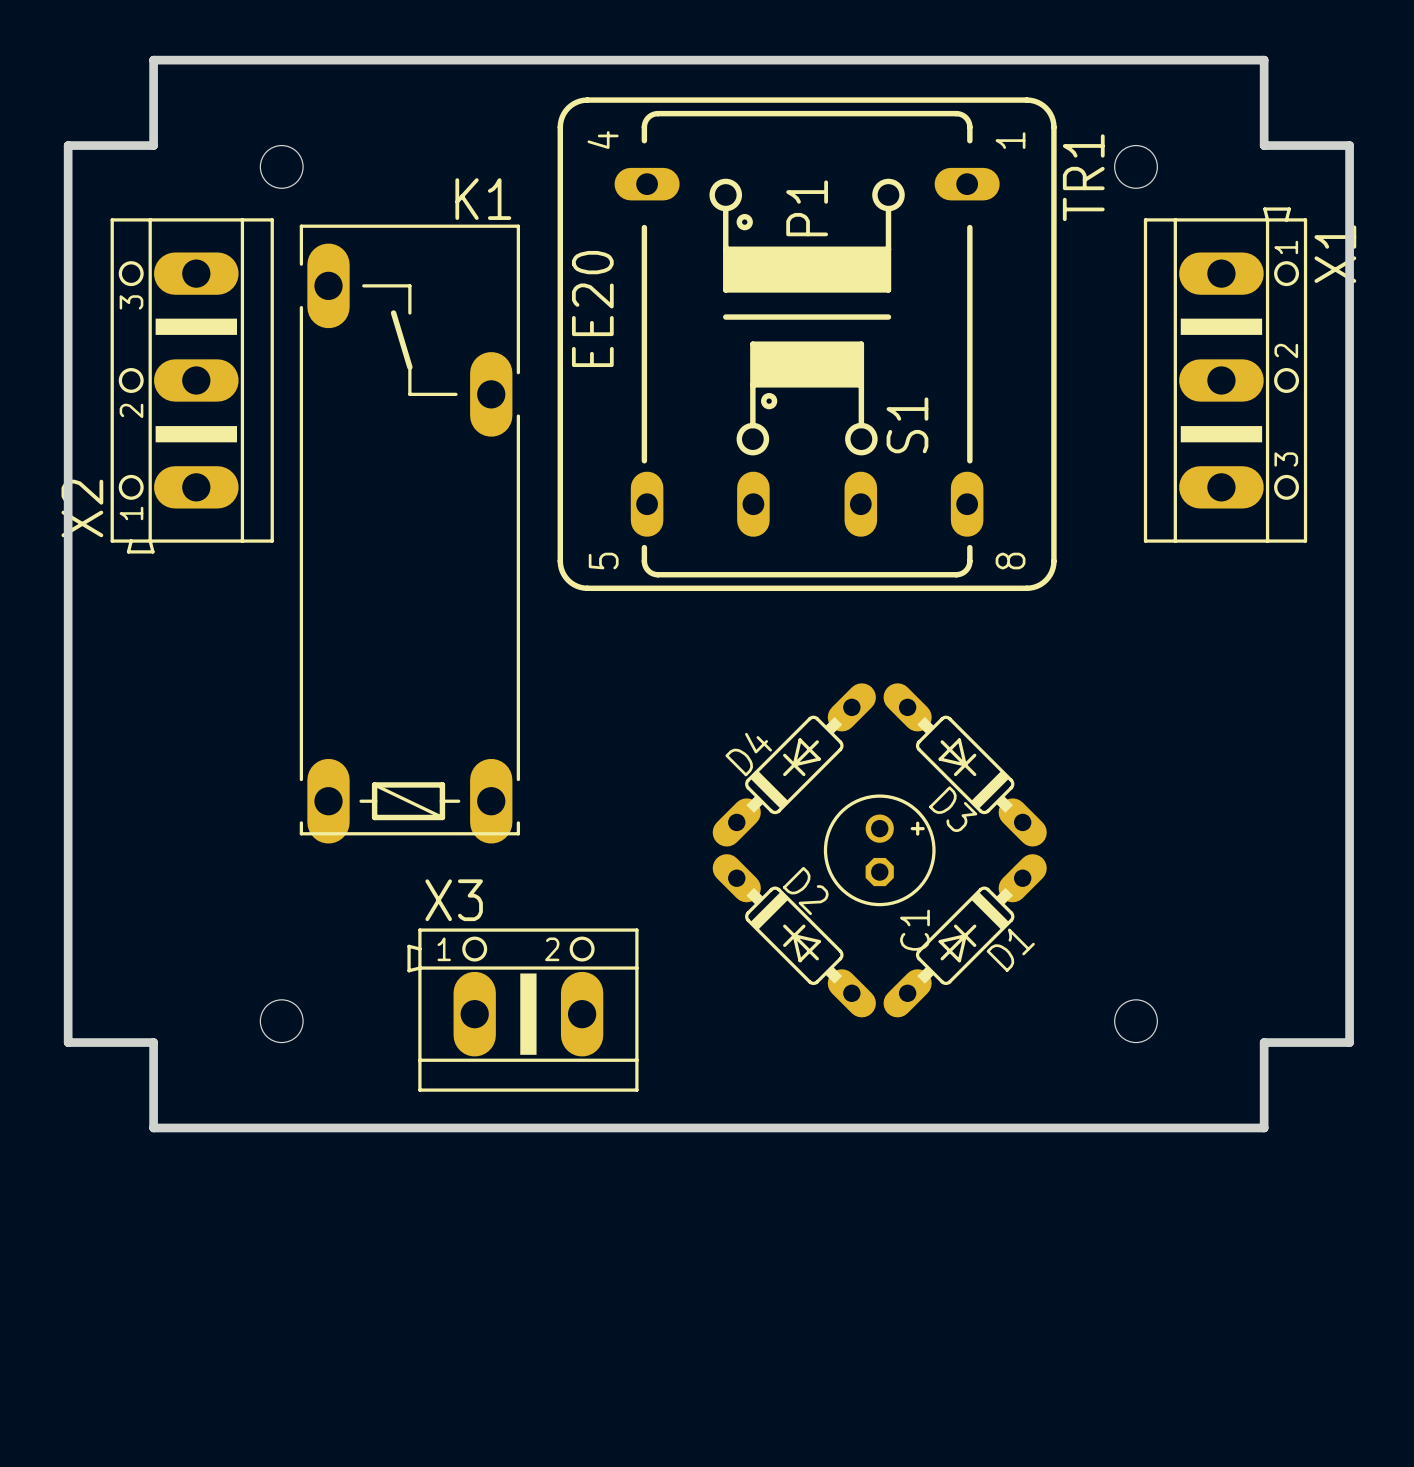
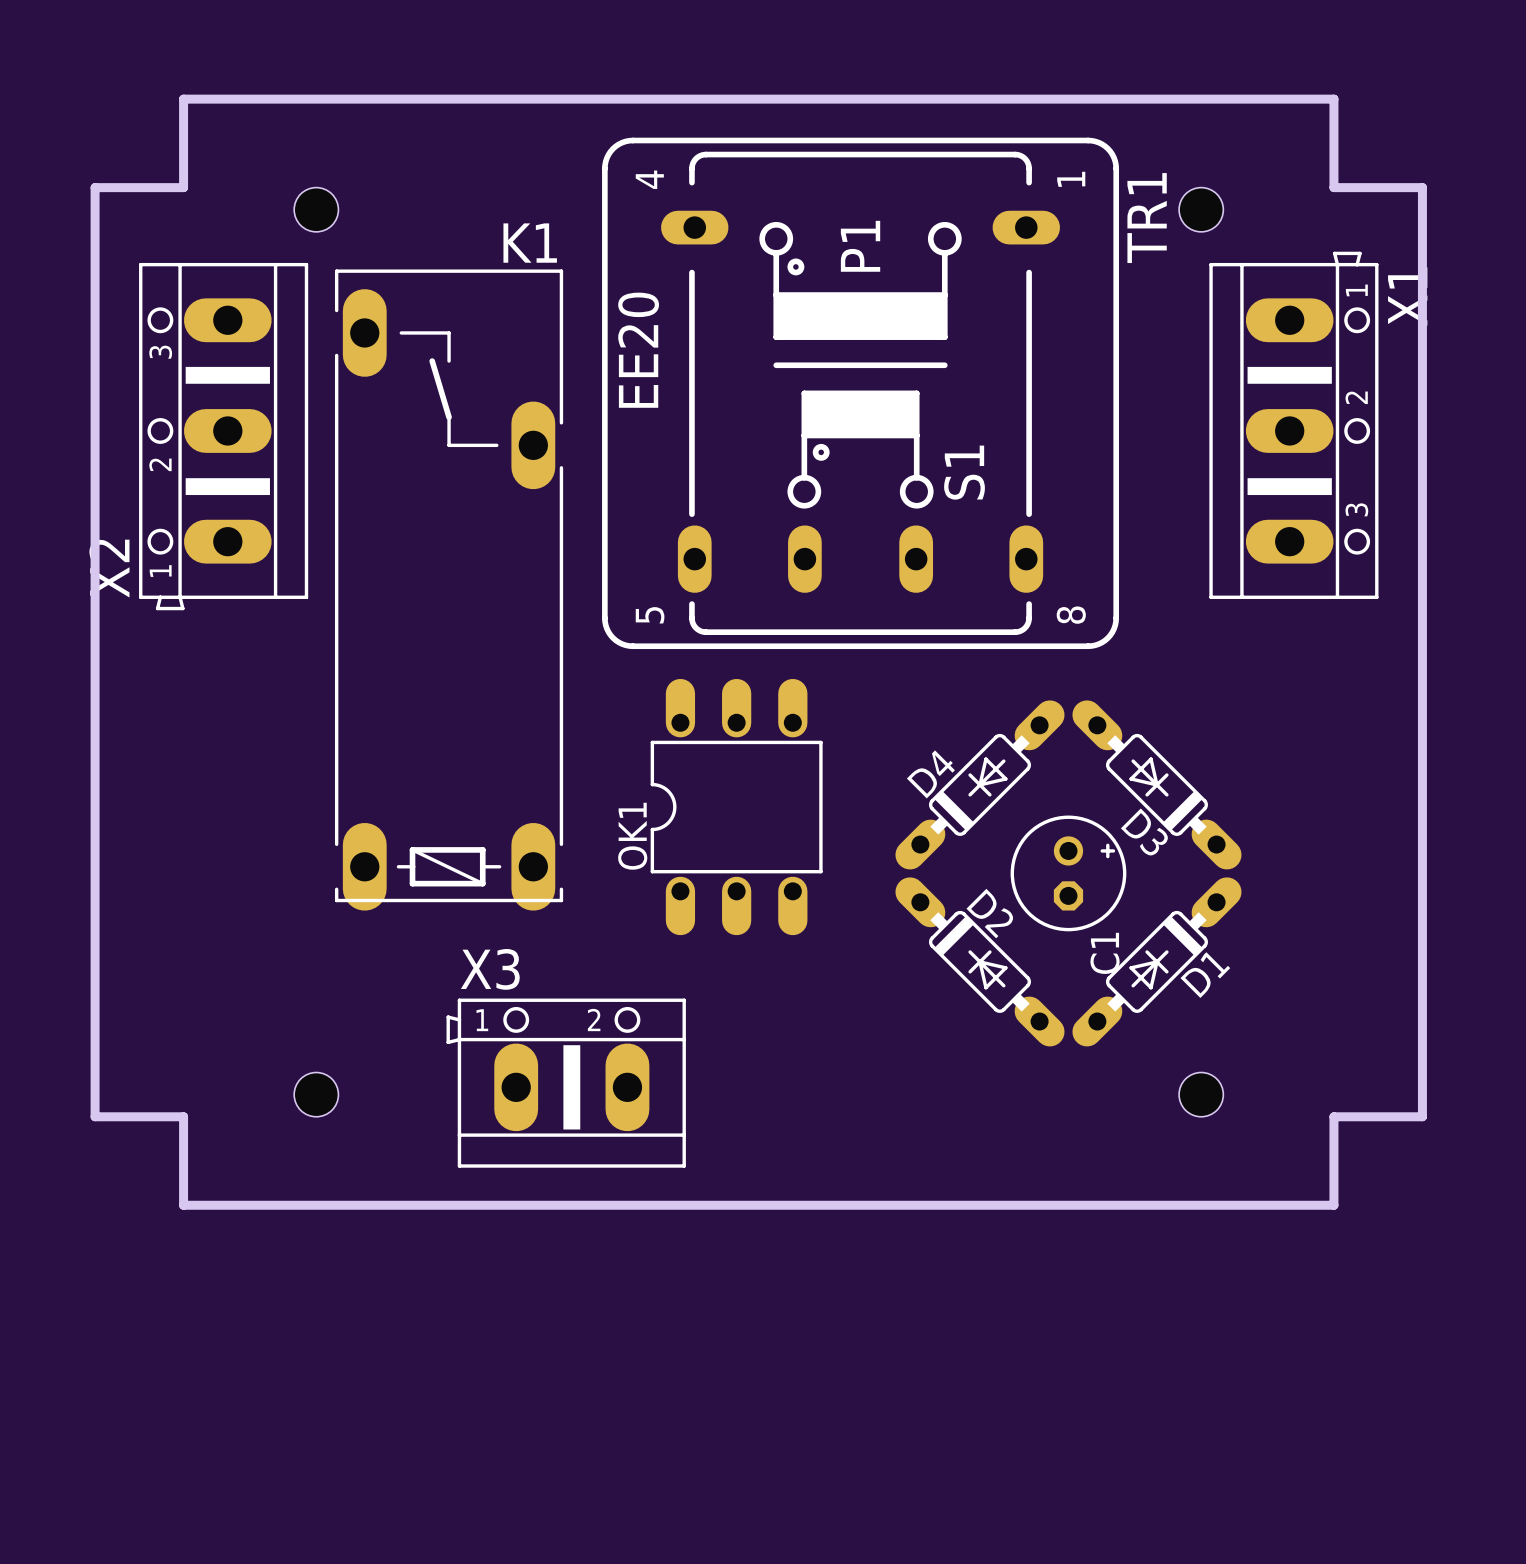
OK1: none -> (736, 807)
D4 position: (794, 764) -> (979, 784)
D3 position: (965, 764) -> (1156, 784)
C1 position: (879, 850) -> (1068, 873)
D2 position: (794, 935) -> (979, 961)
D1 position: (965, 935) -> (1156, 961)

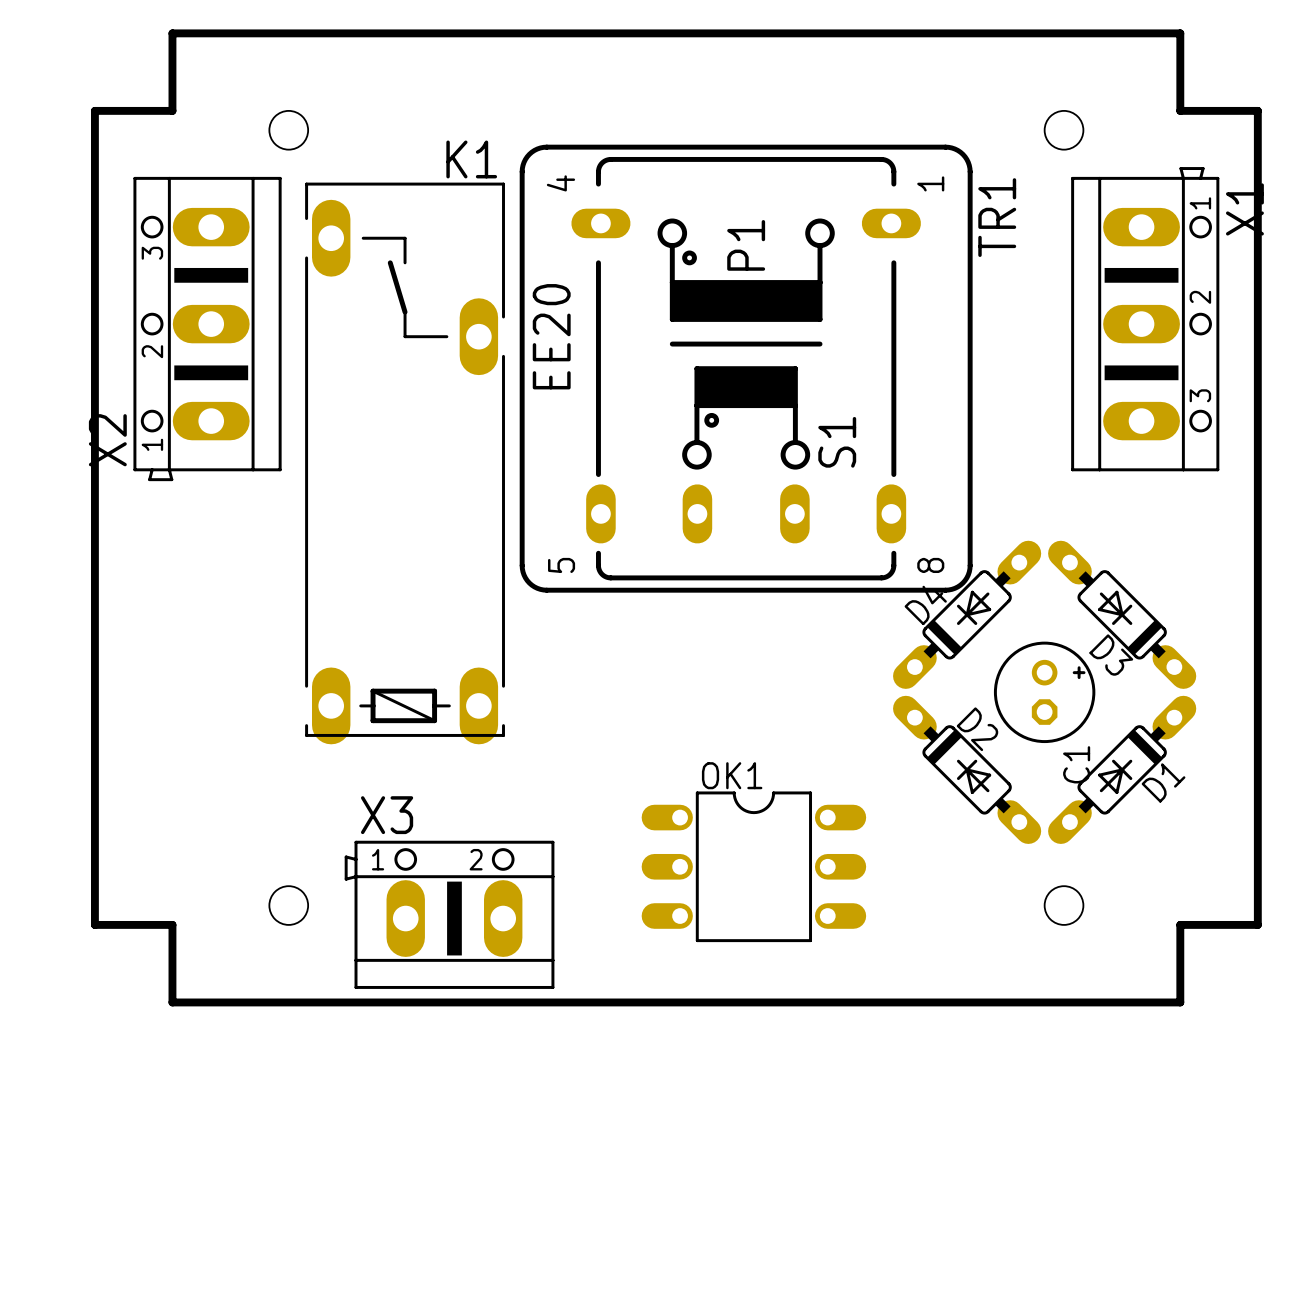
TR1 position: (860, 393) -> (746, 368)
D4 position: (979, 784) -> (967, 614)
D3 position: (1156, 784) -> (1122, 614)
OK1 rotation: 0° (736, 807) -> 90° clockwise (753, 866)
OK1 position: (736, 807) -> (753, 866)
C1 position: (1068, 873) -> (1044, 692)
D2 position: (979, 961) -> (967, 769)
D1 position: (1156, 961) -> (1122, 769)
X3 position: (566, 1083) -> (449, 914)

